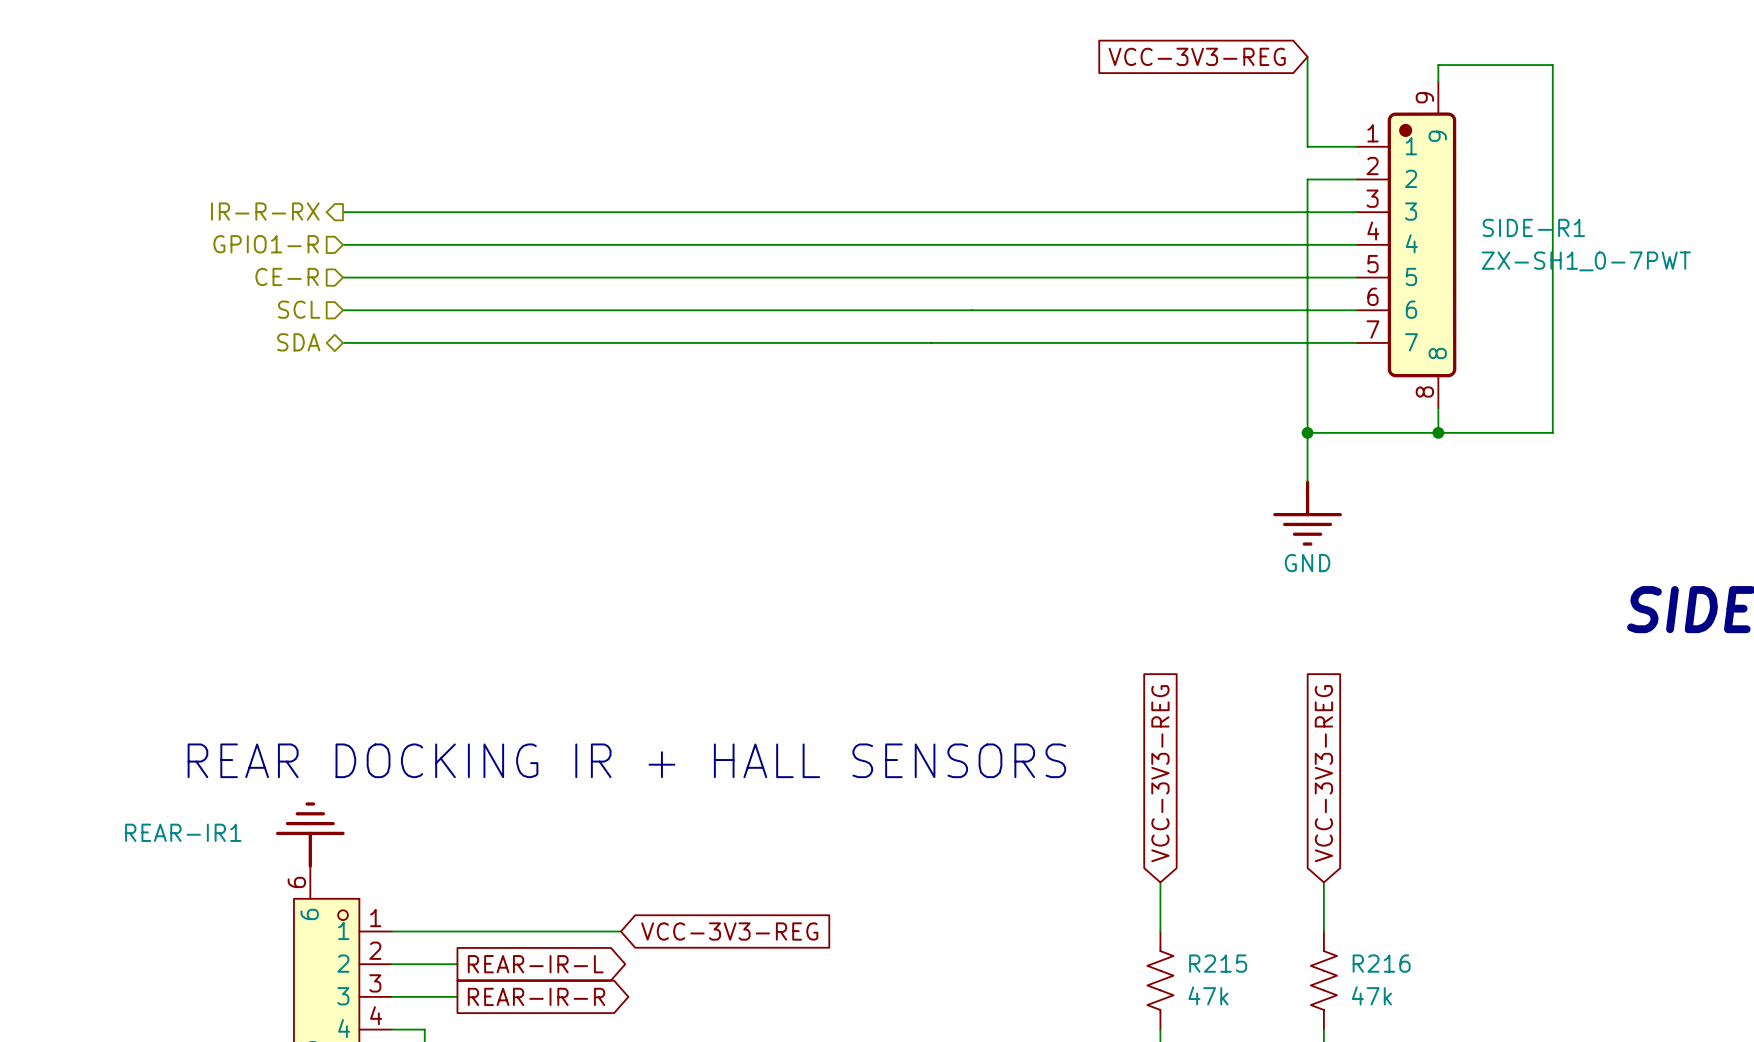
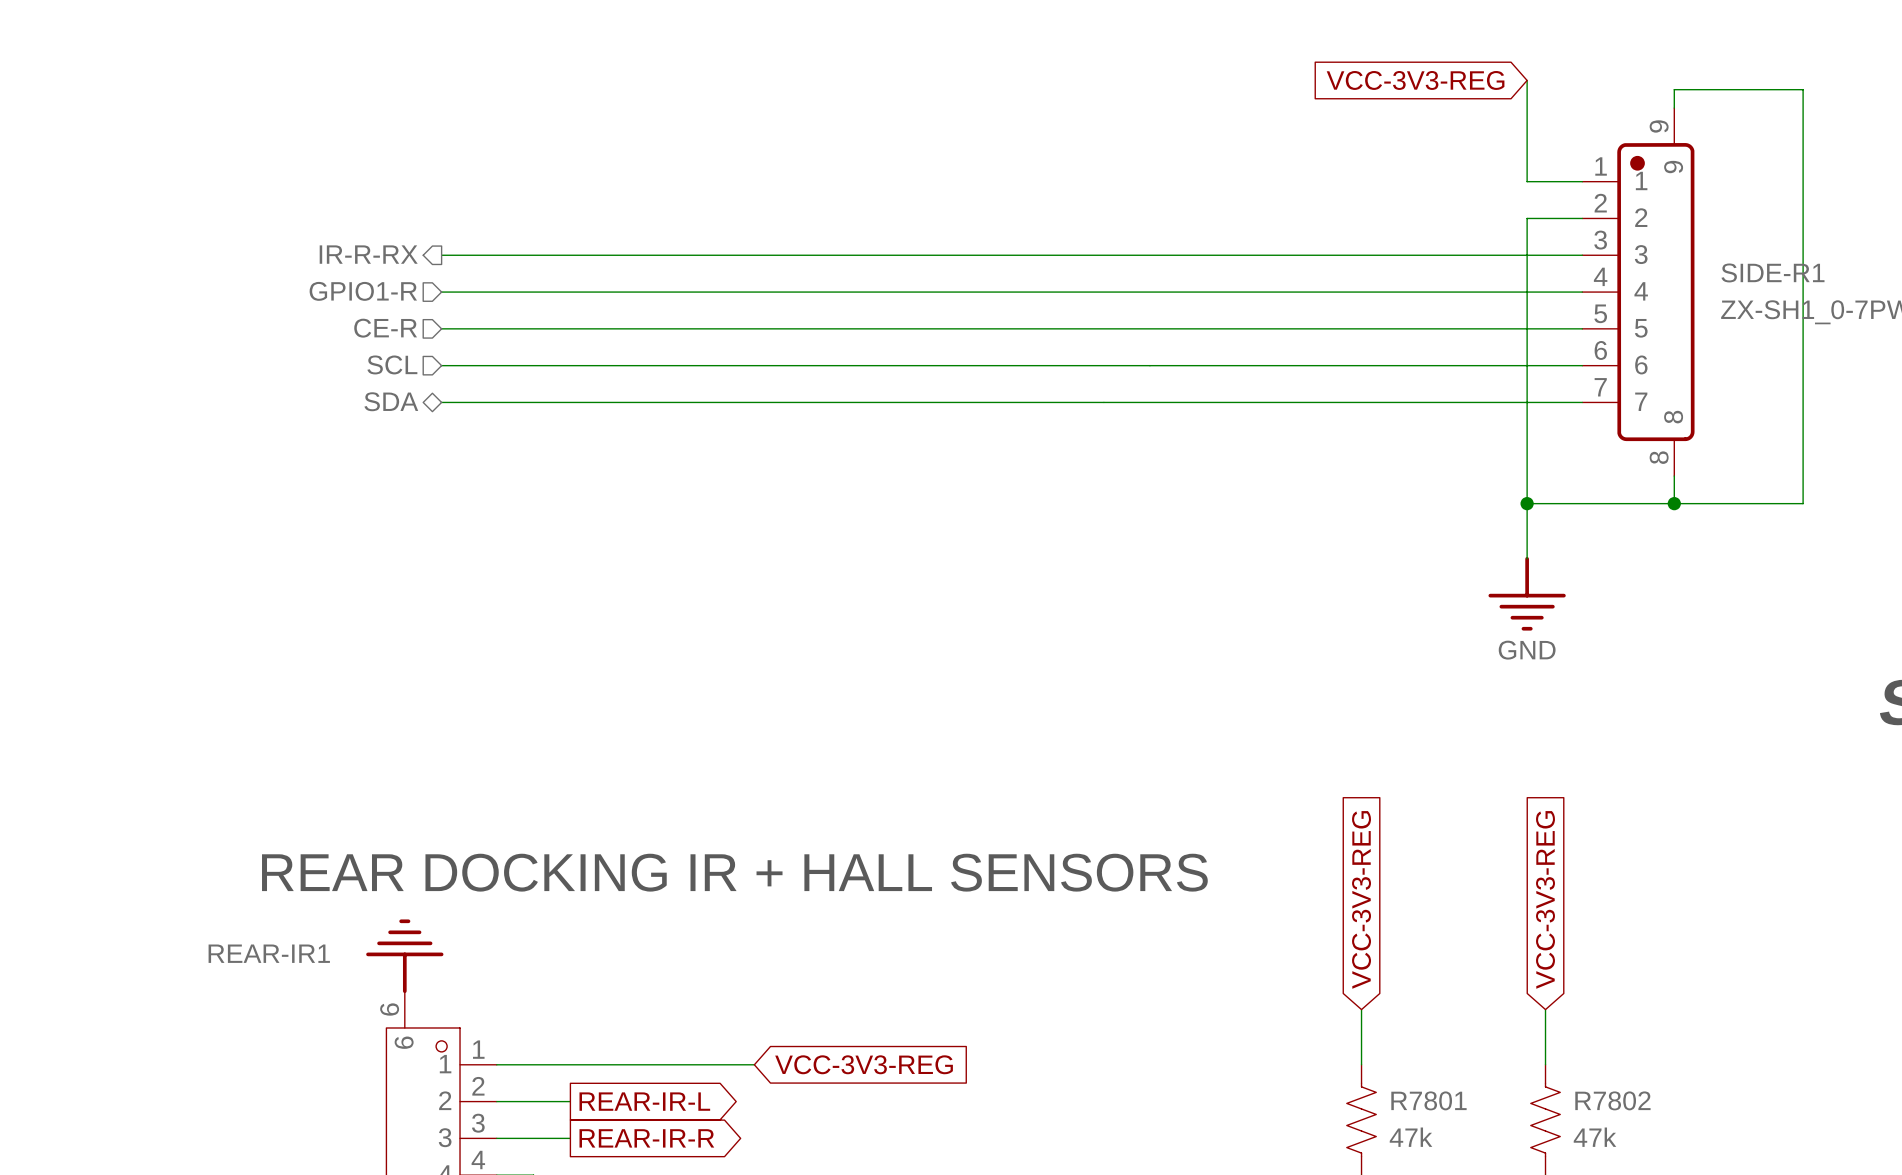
R215 name: R215 (1218, 963) -> R7801 (1428, 1100)
R216 name: R216 (1381, 963) -> R7802 (1612, 1100)

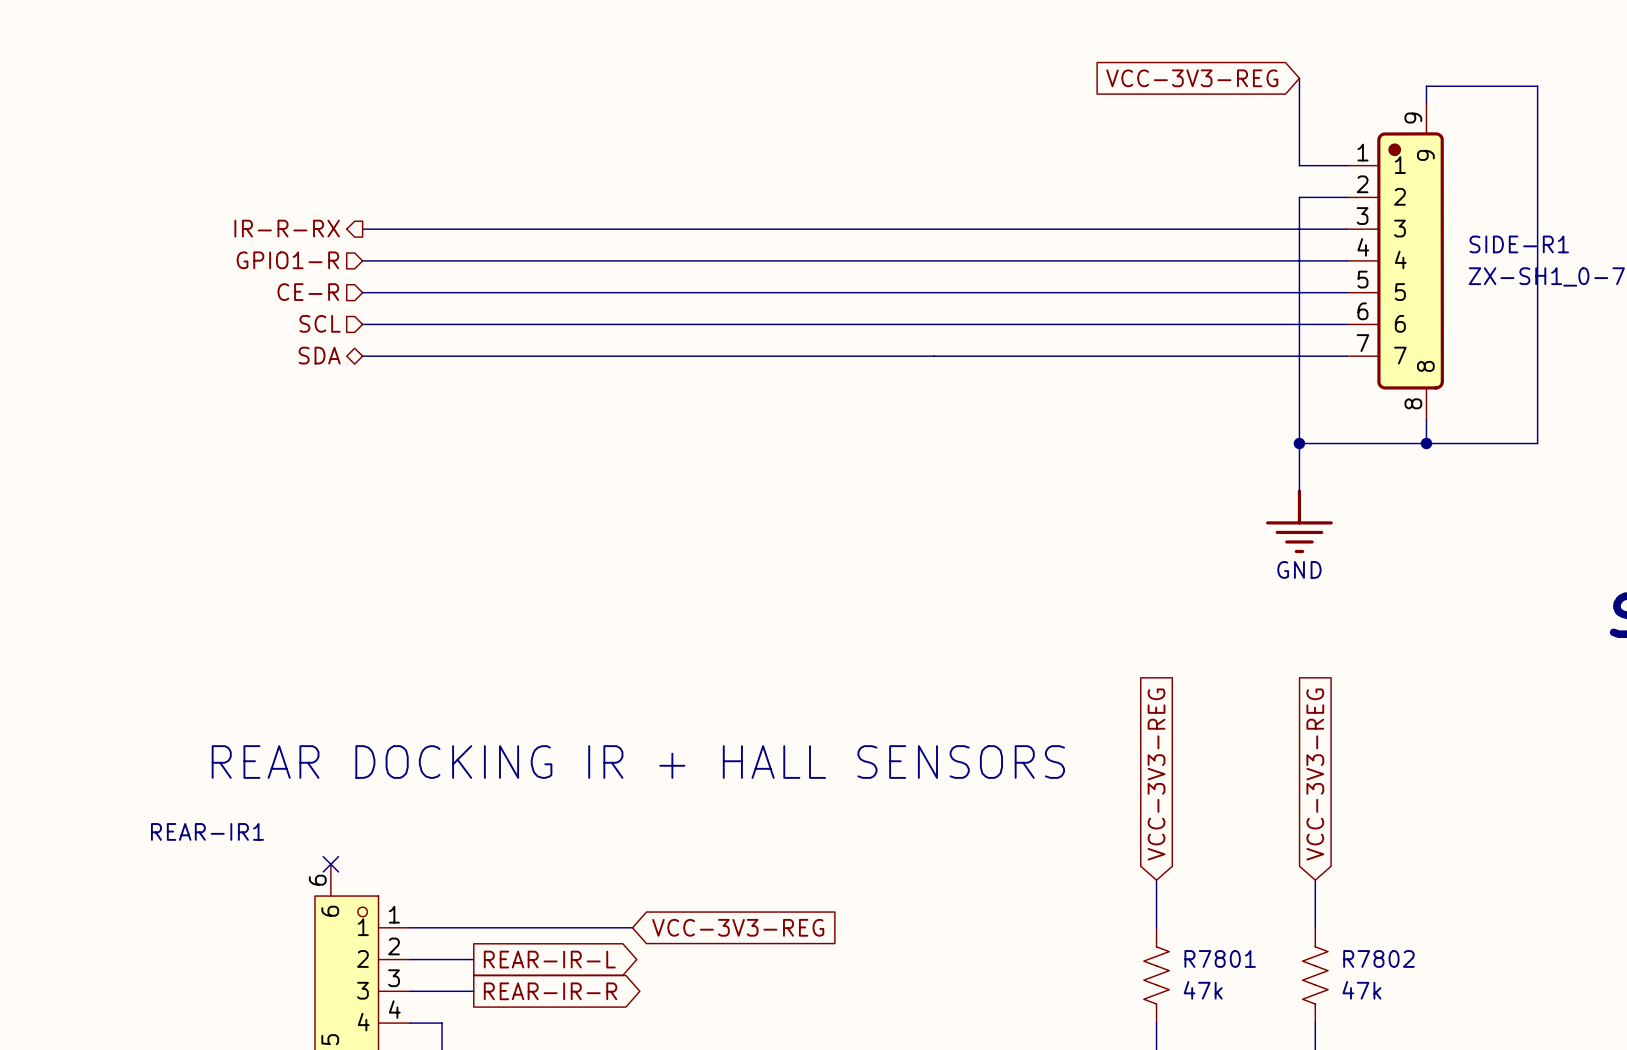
power symbol: (404, 956) -> none
no-connect mark: none -> (330, 864)

